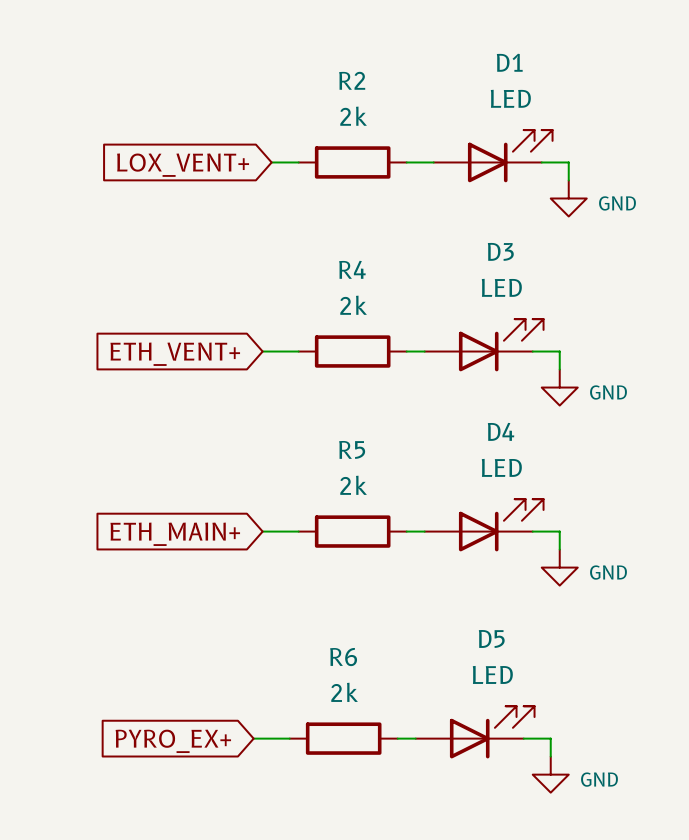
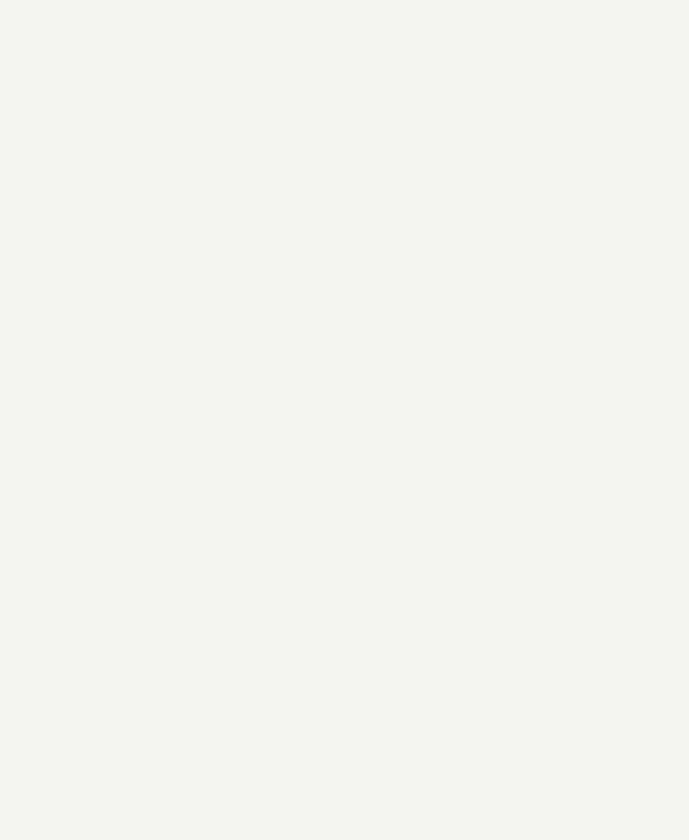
D1: LED (493, 156) -> none
wire: (271, 162) (298, 162) -> none
R2: 2k (352, 162) -> none
wire: (406, 162) (433, 162) -> none
wire: (541, 162) (568, 162) (568, 180) -> none
global label: LOX_VENT+ (183, 165) -> none
power symbol: GND (568, 198) -> none
D3: LED (484, 345) -> none
wire: (262, 351) (298, 351) -> none
R4: 2k (352, 351) -> none
wire: (406, 351) (424, 351) -> none
wire: (532, 351) (559, 351) (559, 369) -> none
global label: ETH_VENT+ (175, 354) -> none
power symbol: GND (559, 387) -> none
D4: LED (484, 525) -> none
wire: (262, 531) (298, 531) -> none
R5: 2k (352, 531) -> none
wire: (406, 531) (424, 531) -> none
wire: (532, 531) (559, 531) (559, 549) -> none
global label: ETH_MAIN+ (175, 534) -> none
power symbol: GND (559, 567) -> none
D5: LED (475, 732) -> none
wire: (253, 738) (289, 738) -> none
R6: 2k (343, 738) -> none
wire: (397, 738) (415, 738) -> none
wire: (523, 738) (550, 738) (550, 756) -> none
global label: PYRO_EX+ (173, 741) -> none
power symbol: GND (550, 774) -> none

